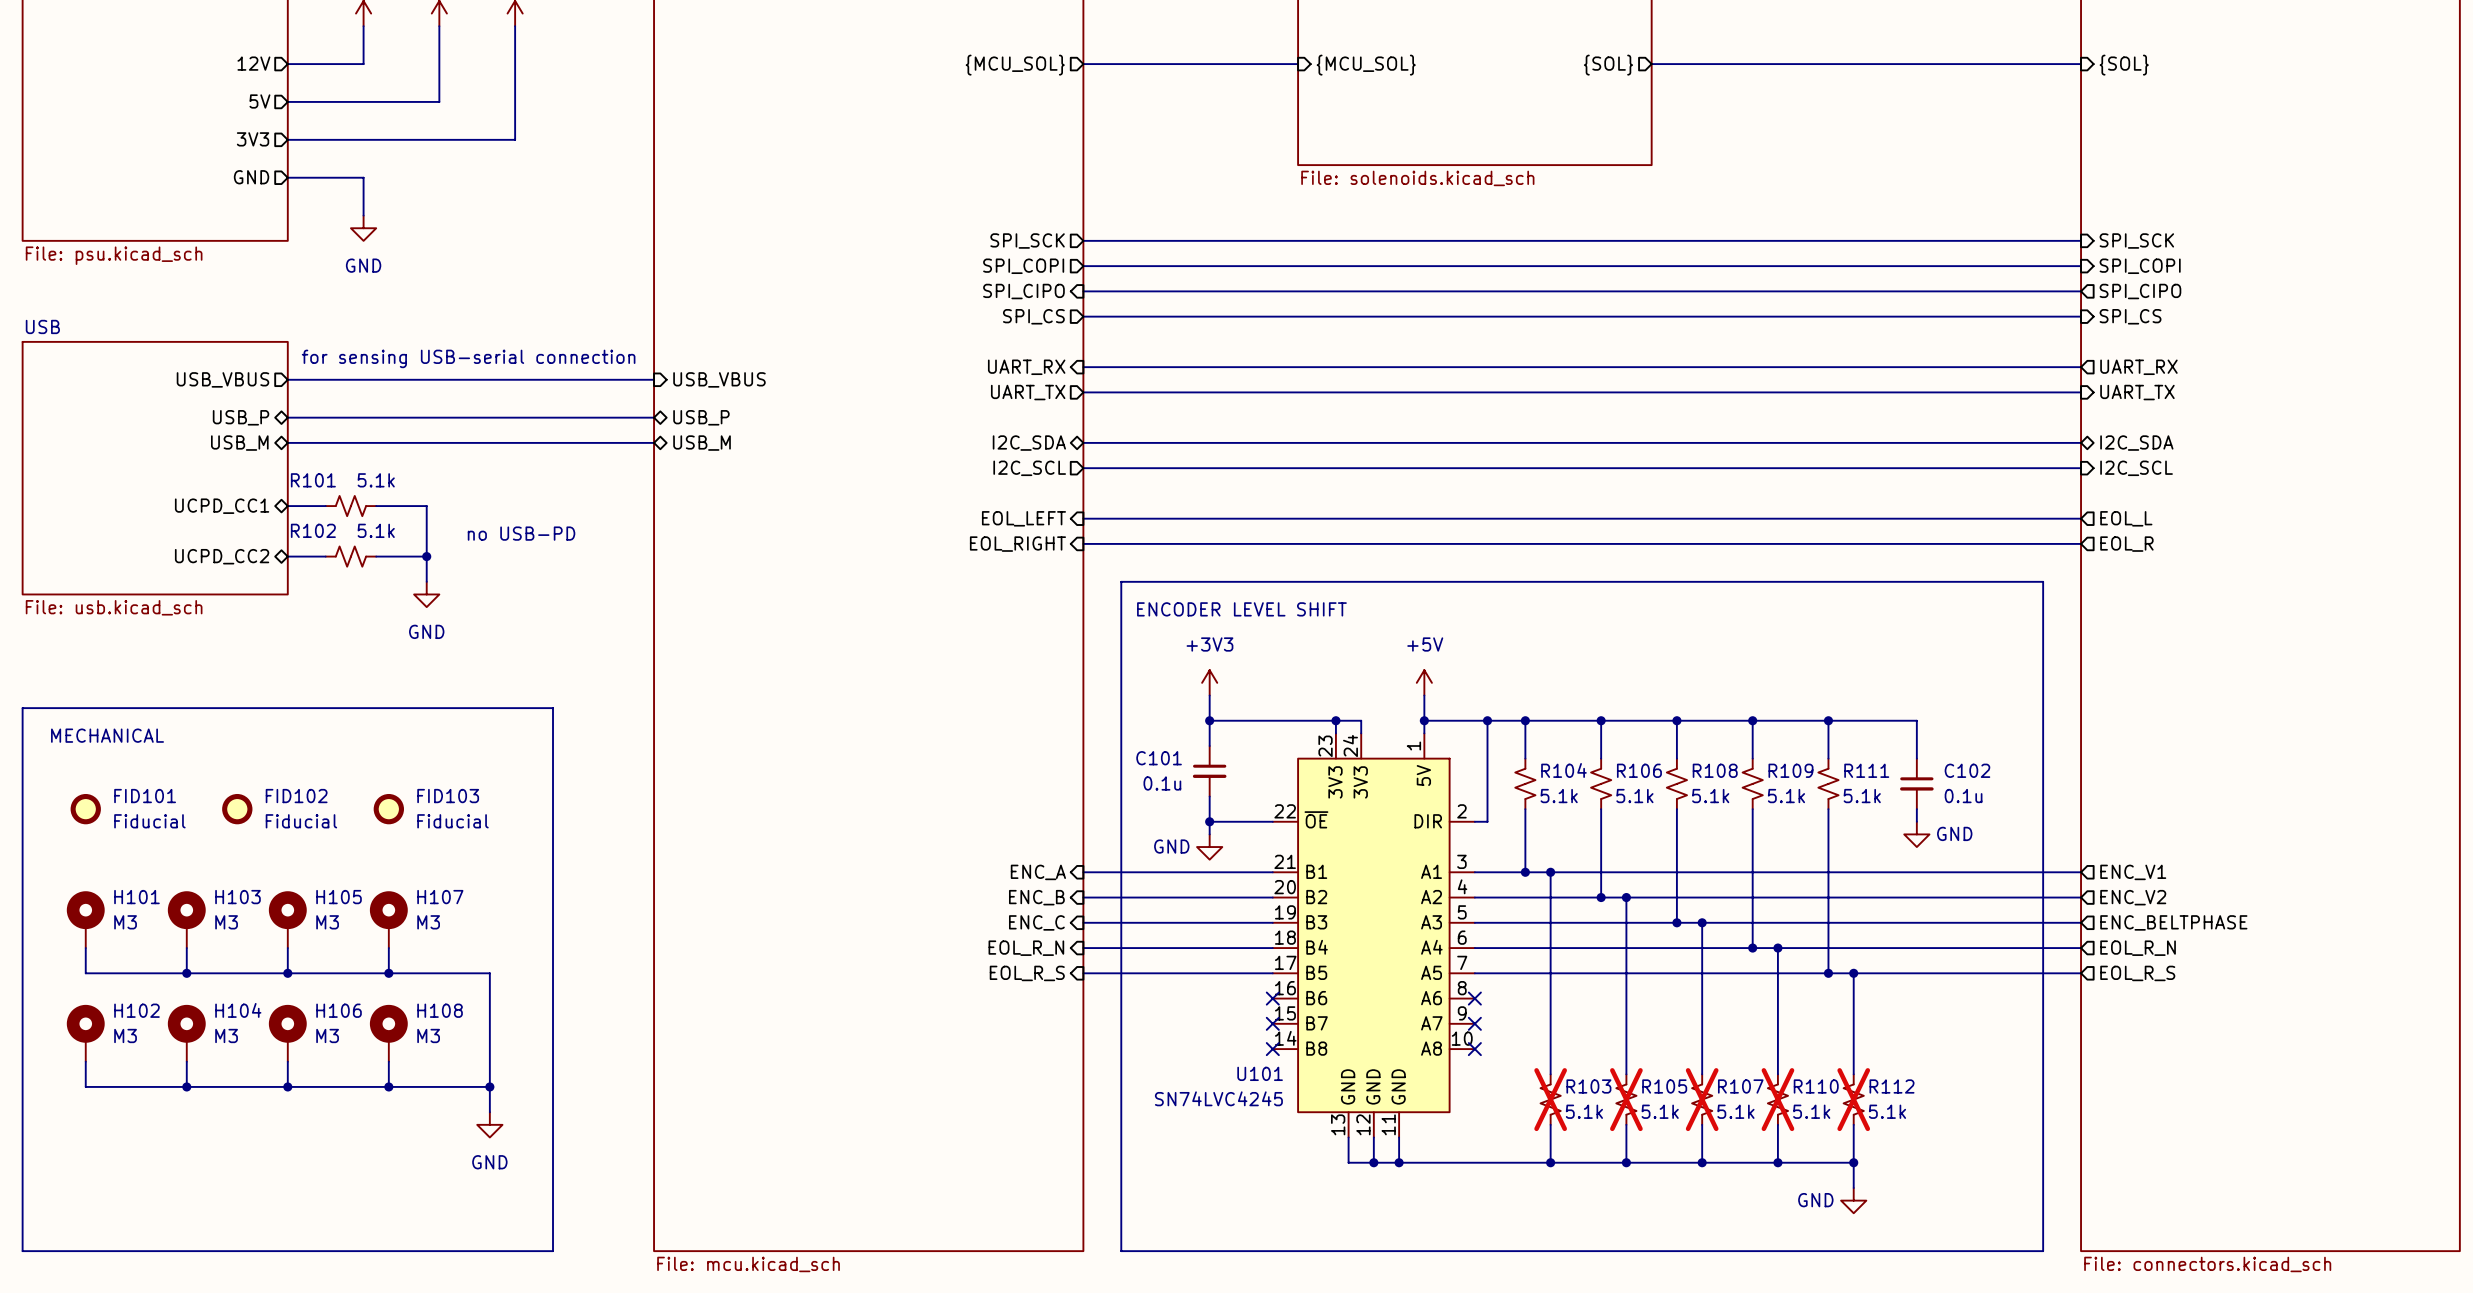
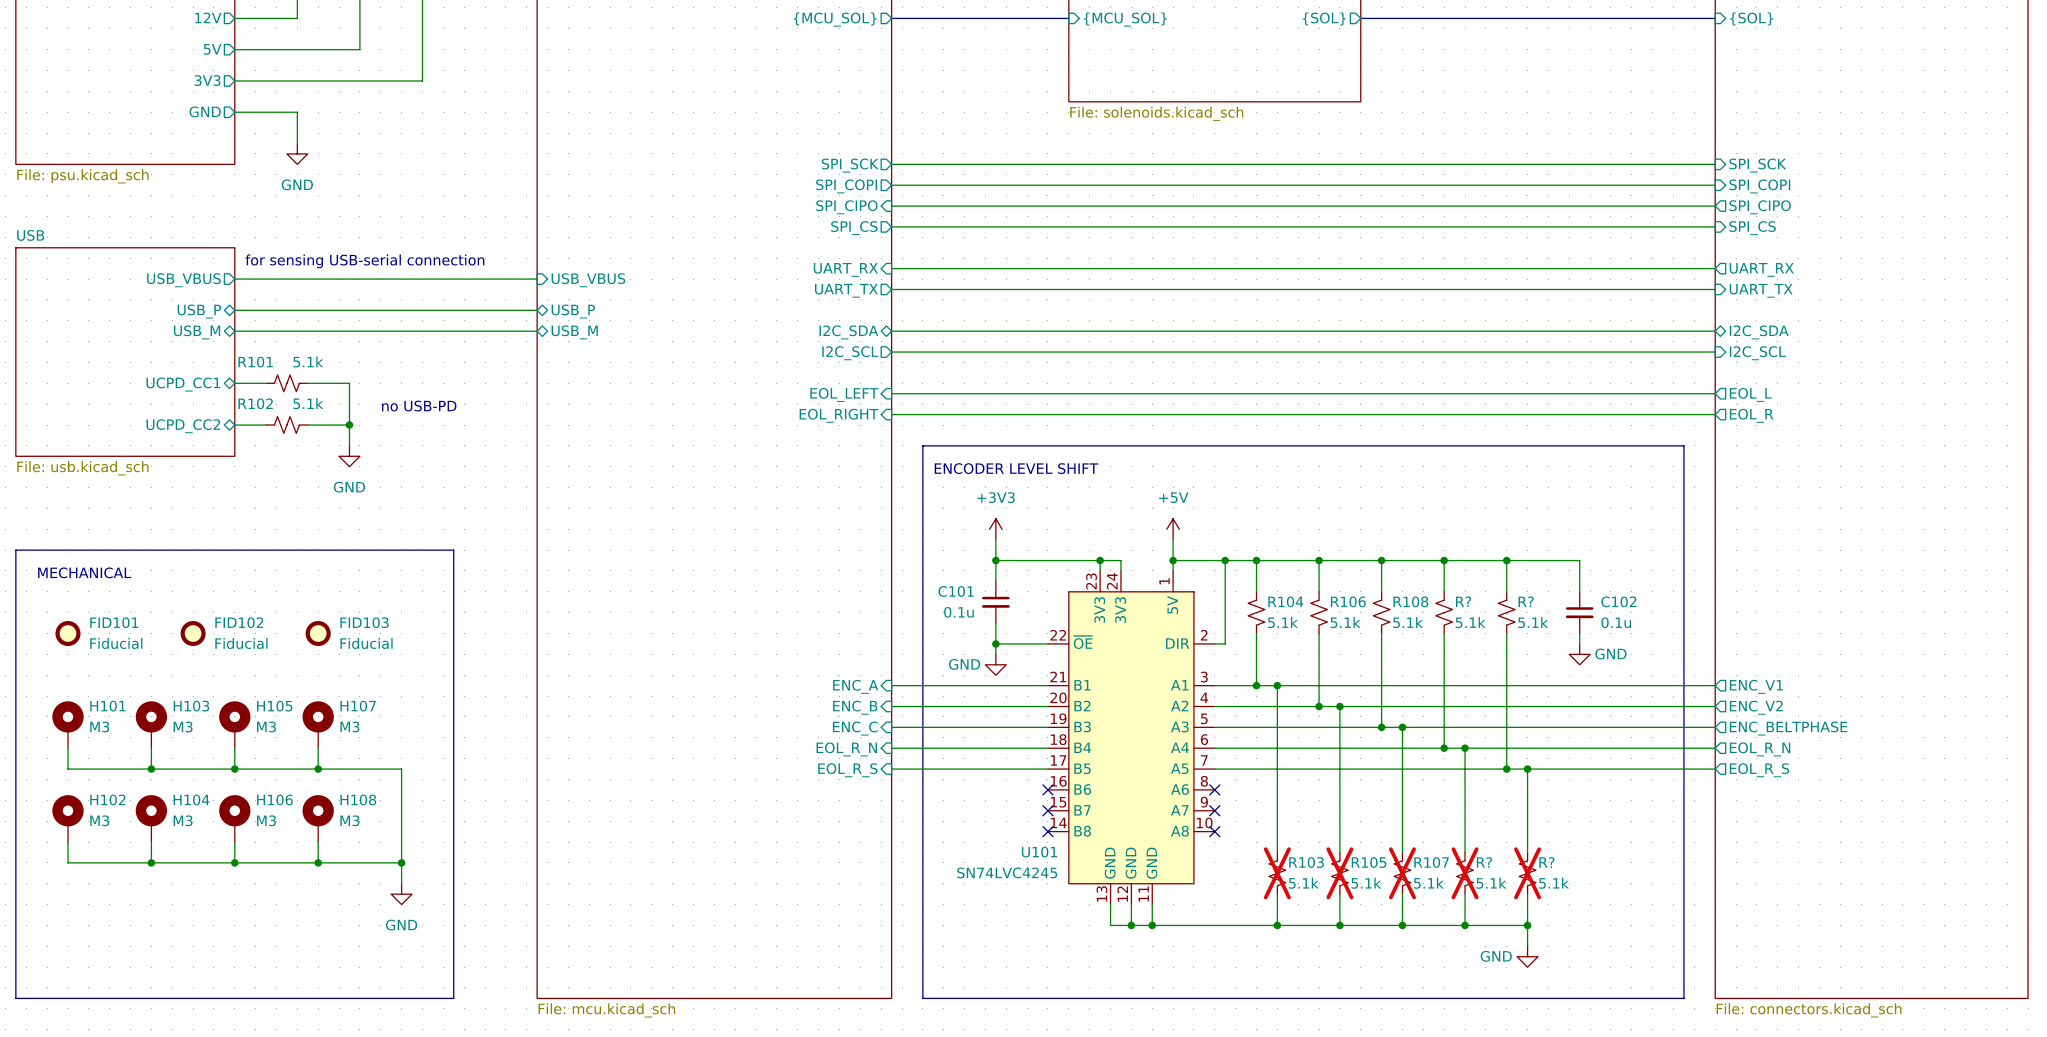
R109 name: R109 (1790, 770) -> R? (1463, 601)
R111 name: R111 (1866, 770) -> R? (1526, 601)
R110 name: R110 (1816, 1086) -> R? (1484, 862)
R112 name: R112 (1892, 1086) -> R? (1546, 862)

